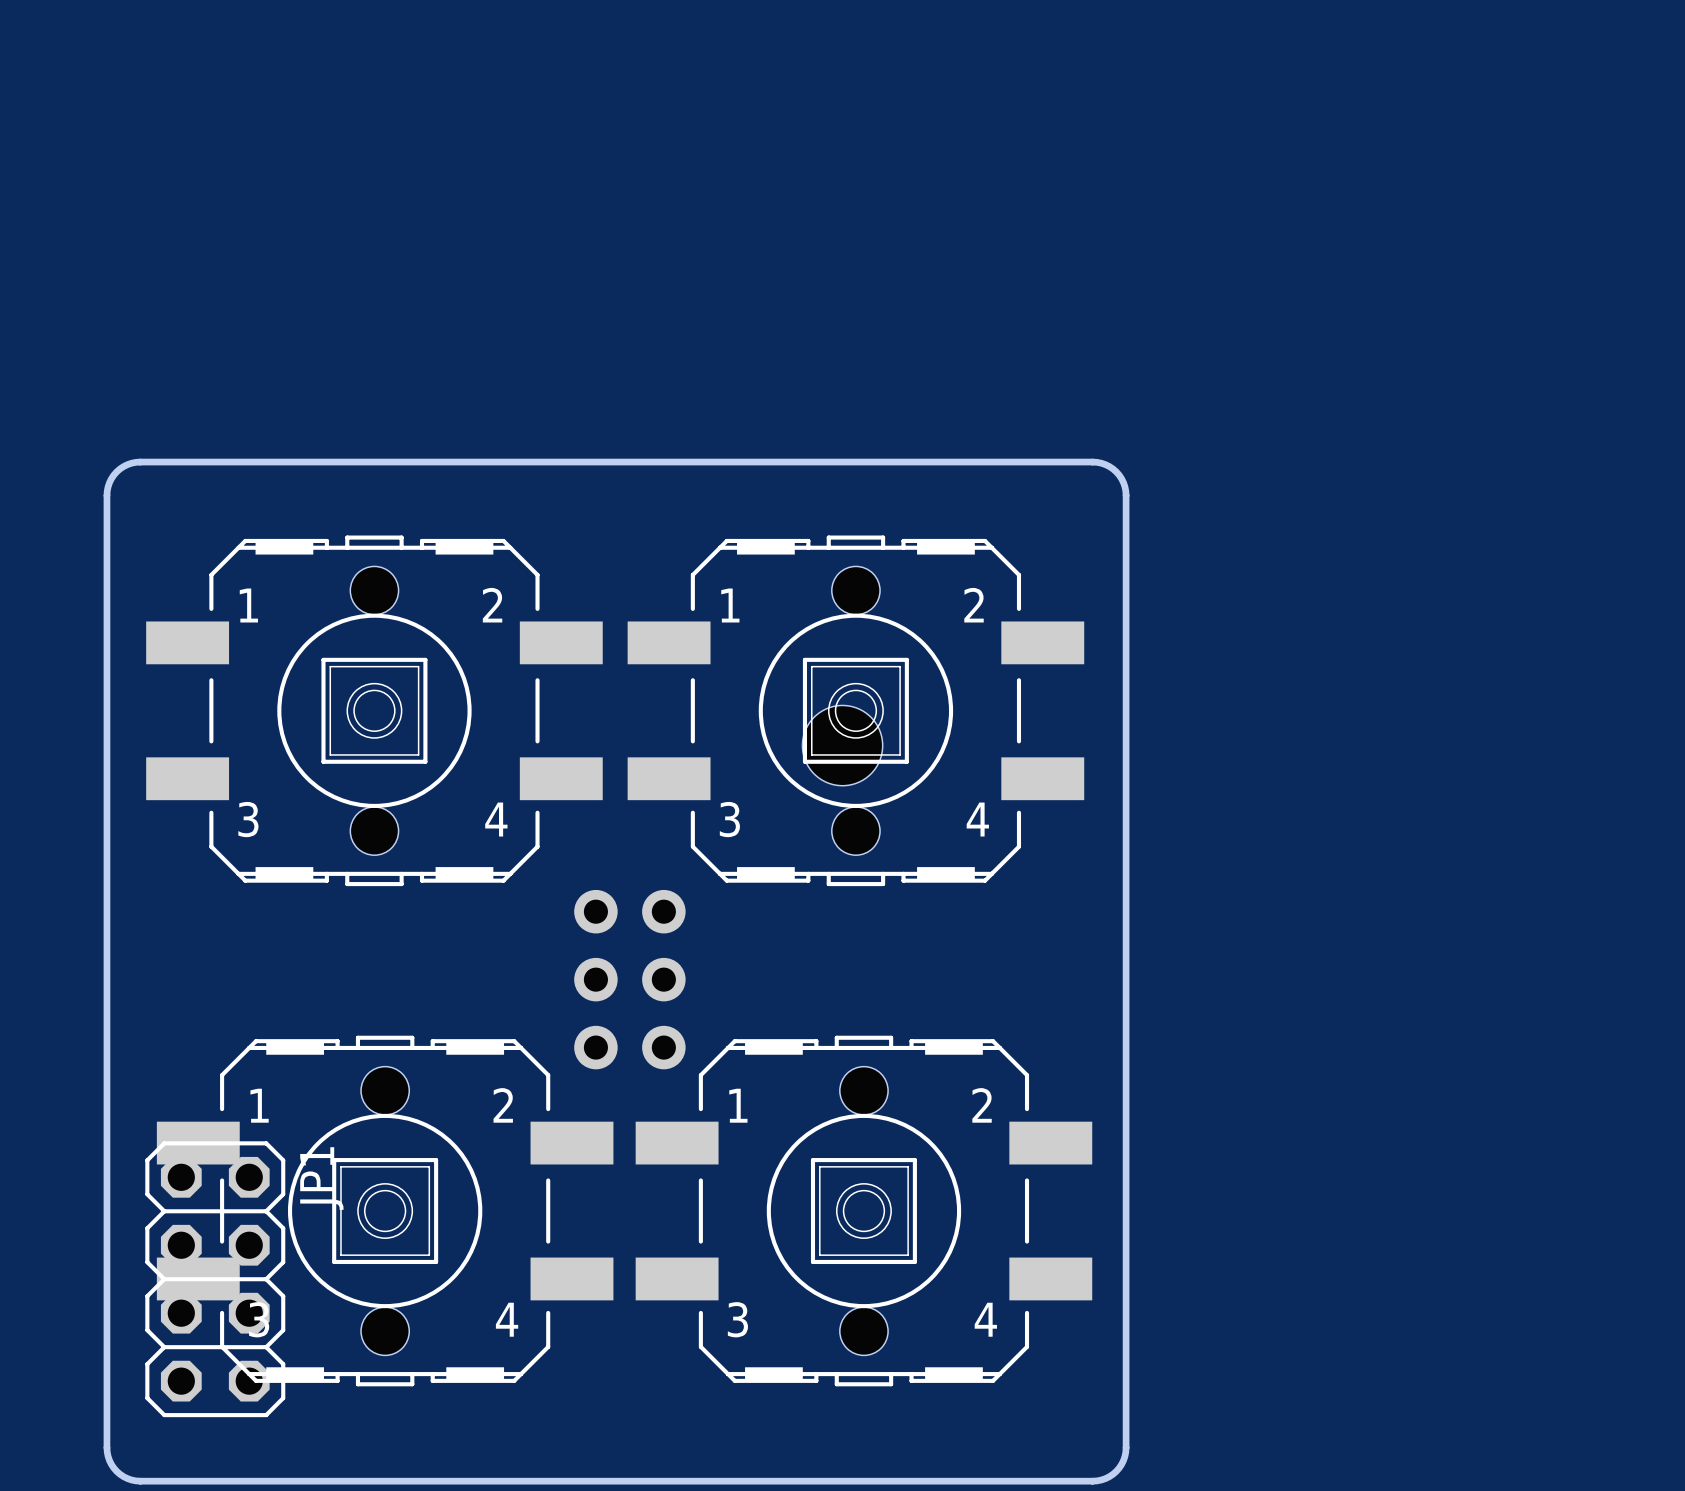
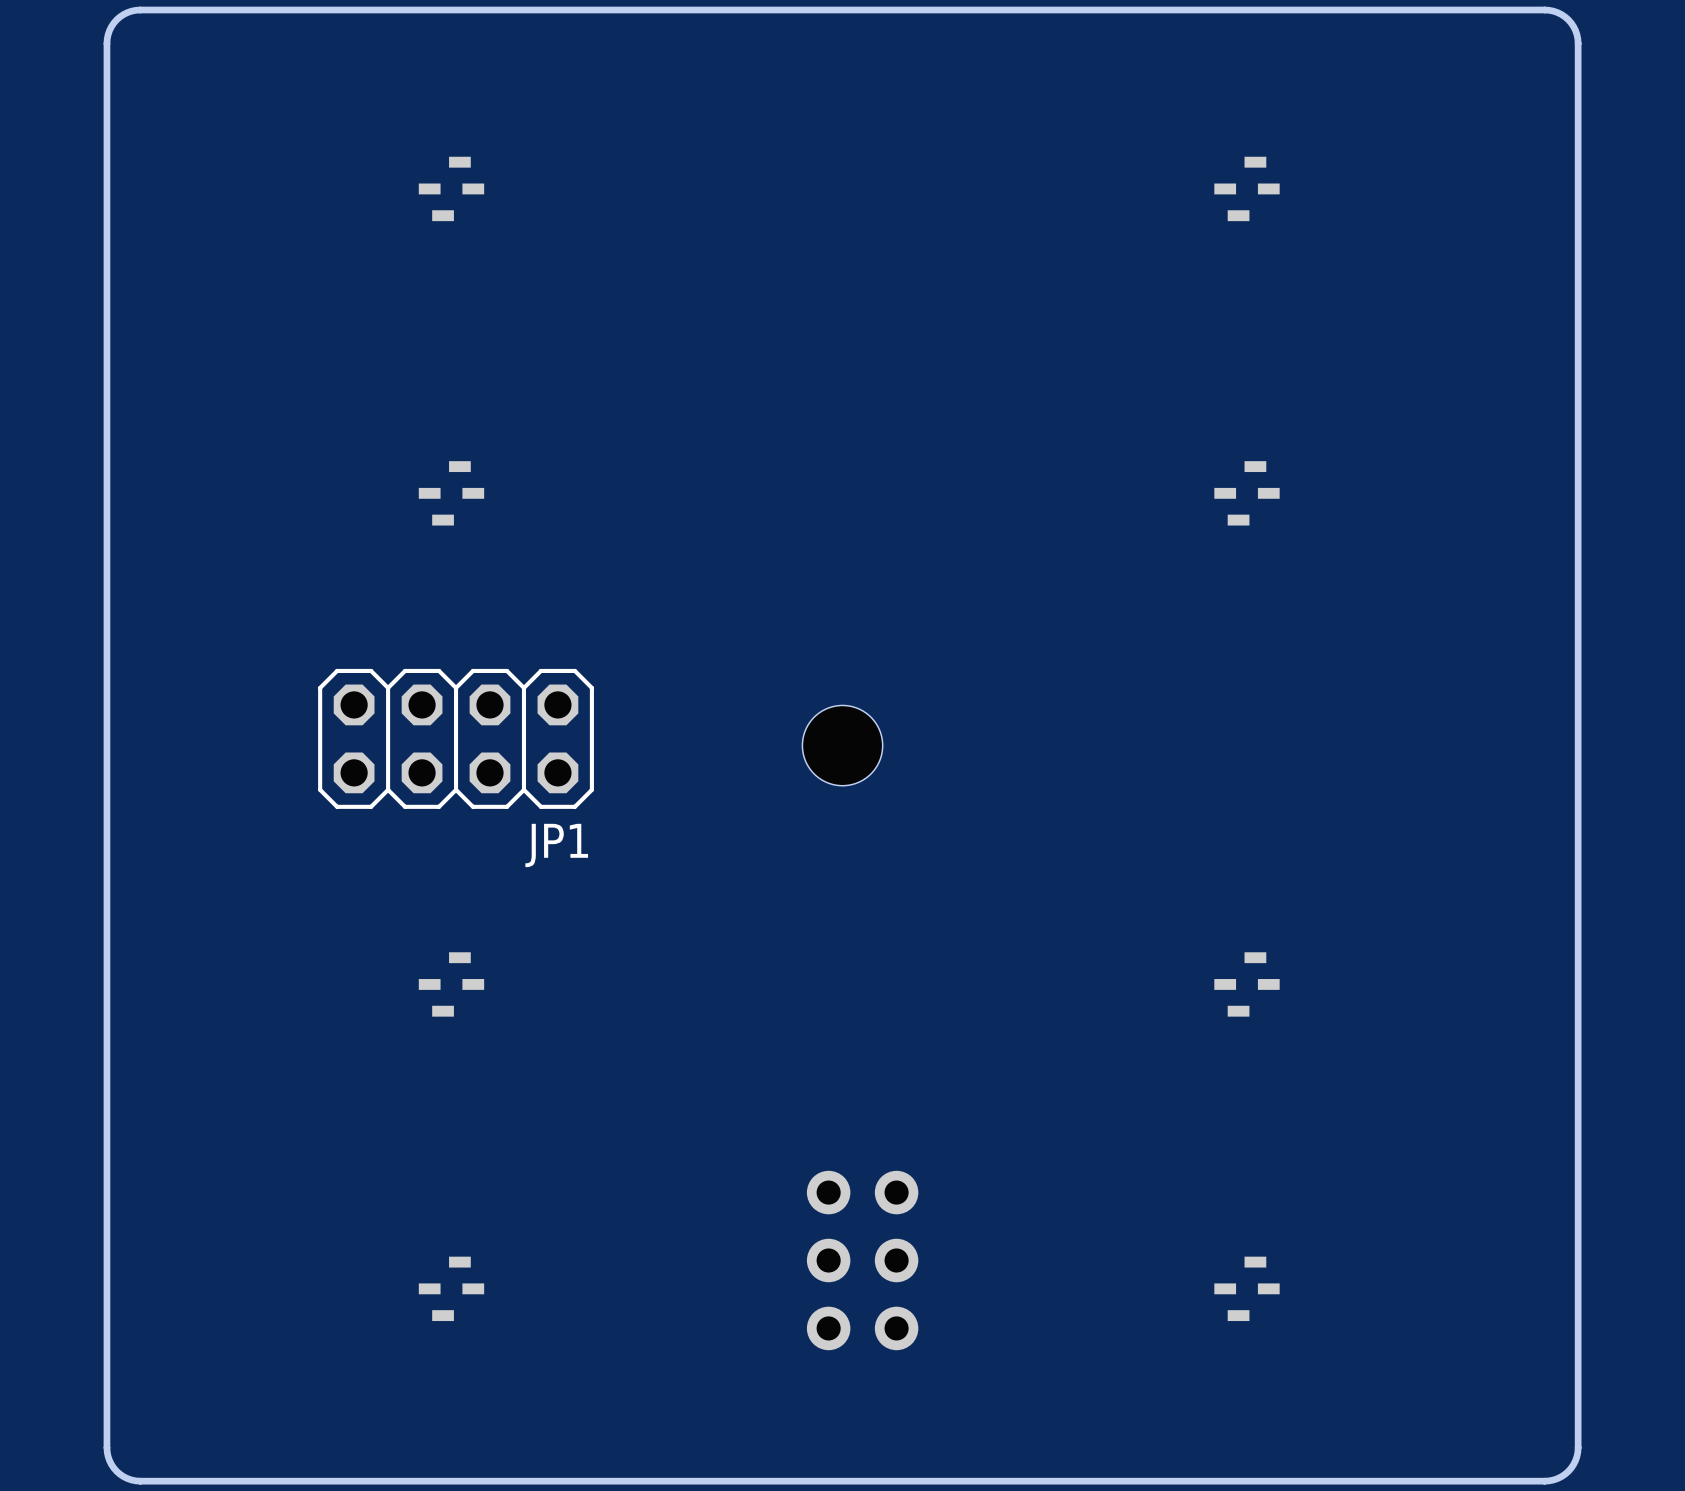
part: none -> (466, 175)
part: none -> (1262, 175)
part: none -> (436, 202)
part: none -> (1231, 202)
part: none -> (466, 479)
part: none -> (1262, 479)
board edge: (106, 495) (109, 482) (116, 471) (127, 464) (140, 462) (1092, 462) (1105, 464) (1116, 471) (1123, 482) (1126, 495) (1126, 1447) (1123, 1460) (1116, 1471) (1105, 1478) (1092, 1481) -> (106, 495) (106, 43) (108, 34) (113, 23) (120, 16) (131, 11) (1544, 9) (1557, 12) (1568, 19) (1575, 30) (1578, 43) (1577, 1456) (1571, 1468) (1565, 1474) (1553, 1480) (1544, 1481) (1092, 1481)
part: none -> (436, 506)
part: none -> (1231, 506)
part: (374, 710) -> none
part: (855, 710) -> none
part: none -> (466, 971)
part: none -> (1262, 971)
part position: (629, 979) -> (862, 1260)
part: none -> (436, 997)
part: none -> (1231, 997)
part: (385, 1211) -> none
part: (863, 1211) -> none
part: none -> (466, 1275)
part: none -> (1262, 1275)
JP1 rotation: 0° (215, 1279) -> 90° clockwise (456, 738)
JP1 position: (215, 1279) -> (456, 738)
part: none -> (436, 1302)
part: none -> (1231, 1302)

